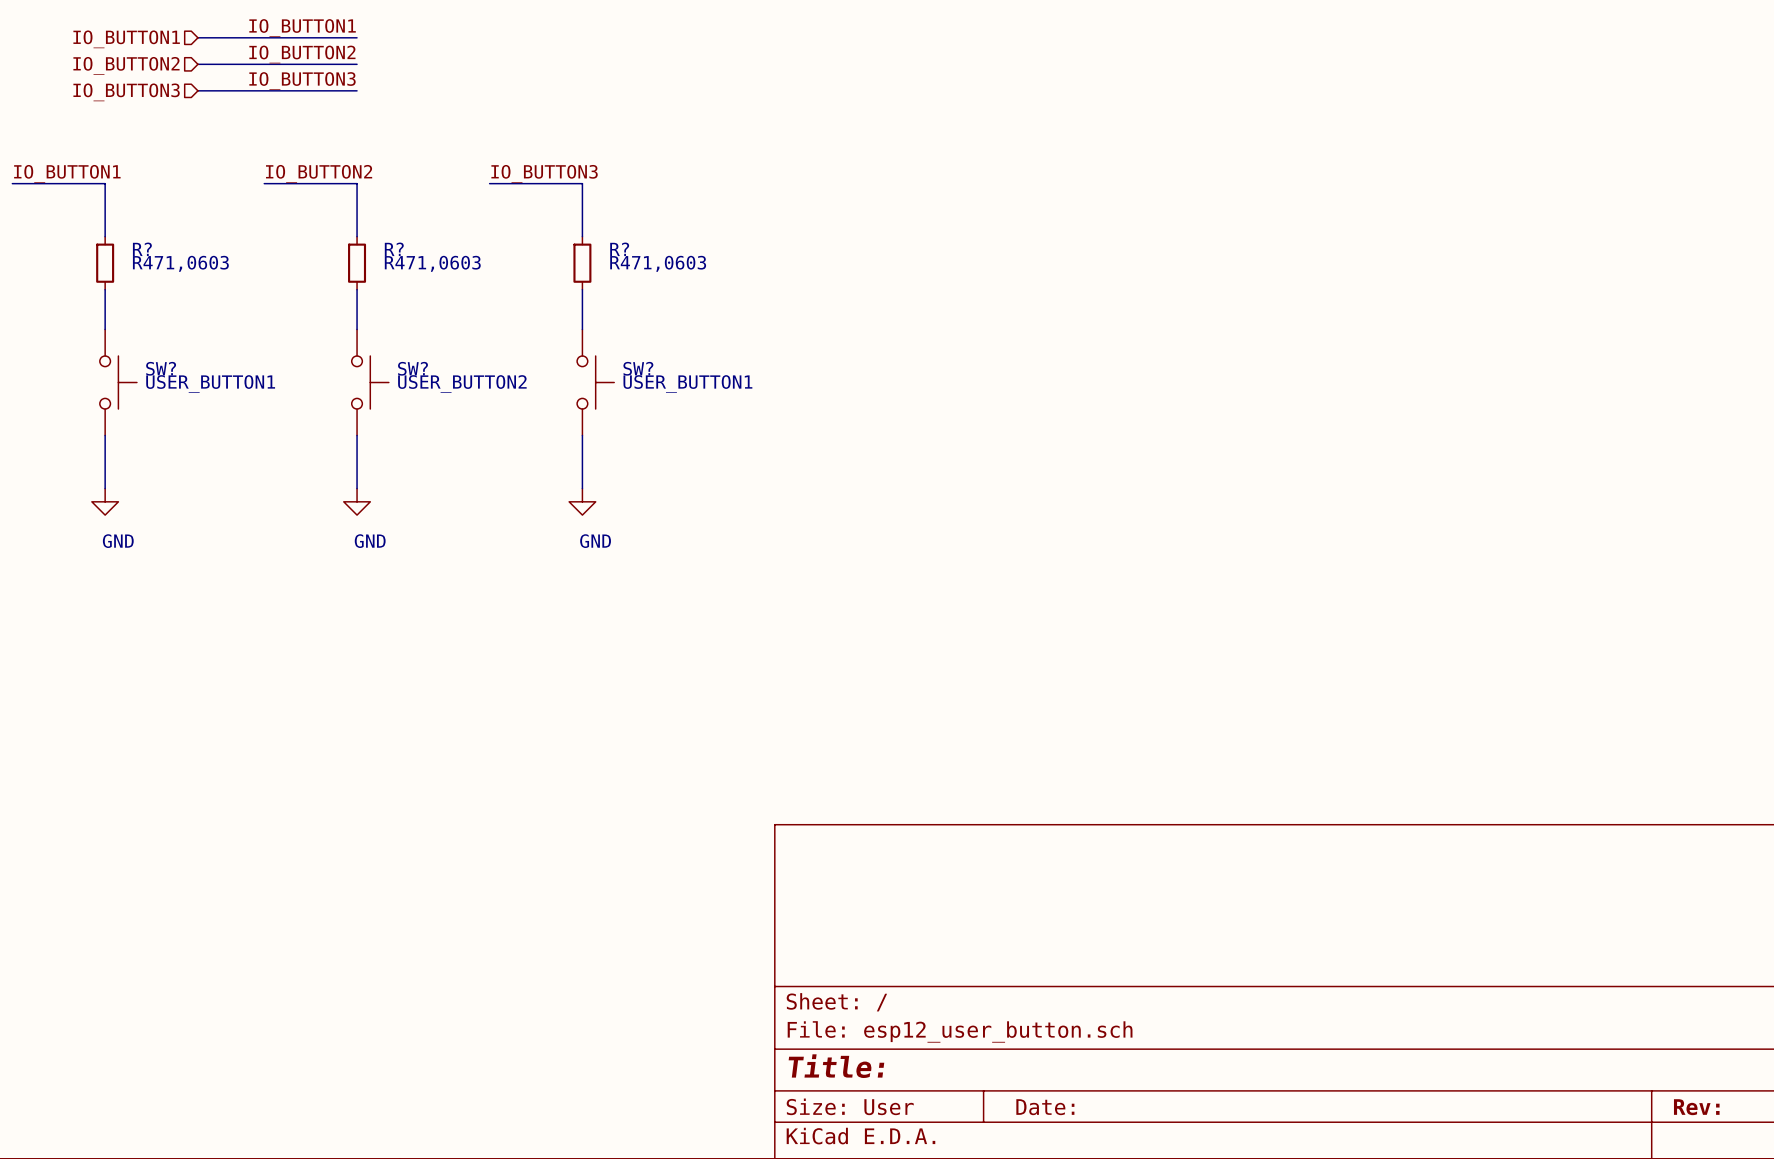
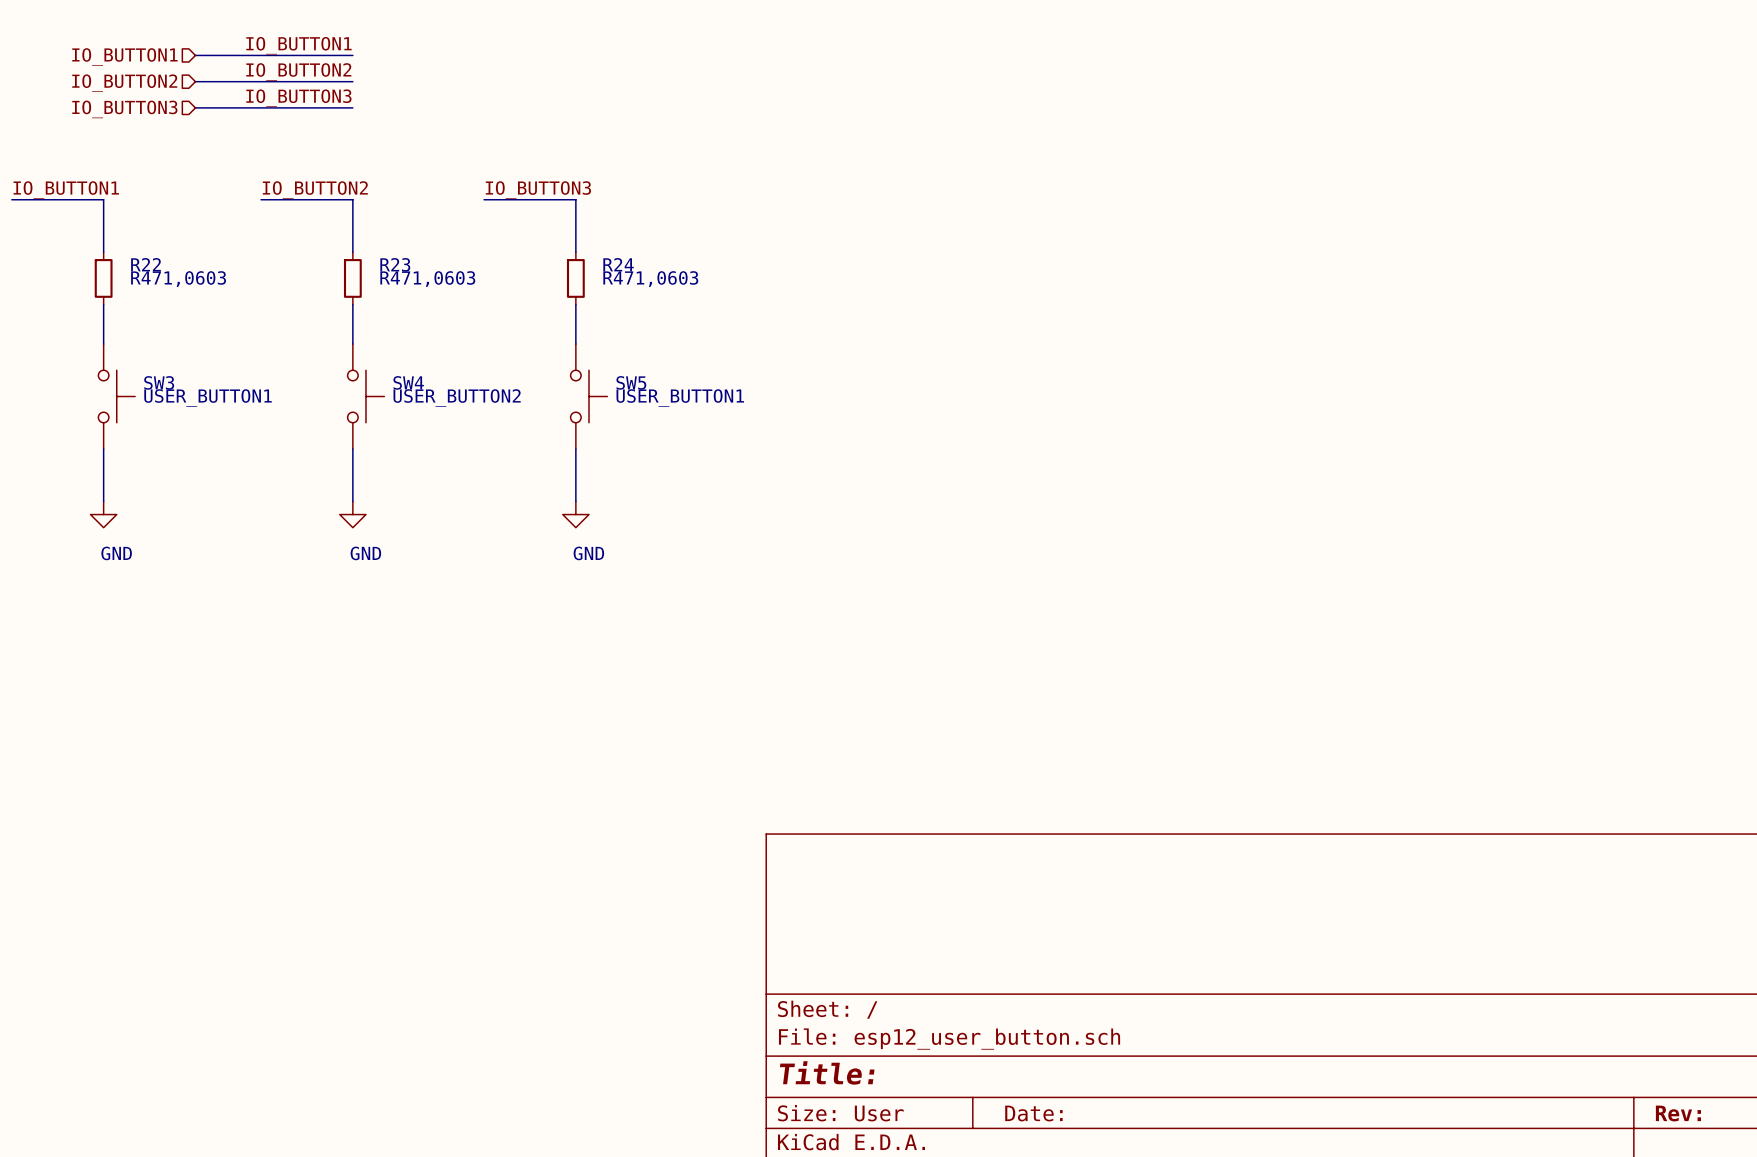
R? name: R? (142, 249) -> R22 (145, 264)
R? name: R? (394, 249) -> R23 (395, 264)
R? name: R? (619, 249) -> R24 (618, 264)
SW? name: SW? (161, 368) -> SW3 (159, 382)
SW? name: SW? (412, 368) -> SW4 (408, 382)
SW? name: SW? (638, 368) -> SW5 (631, 382)

